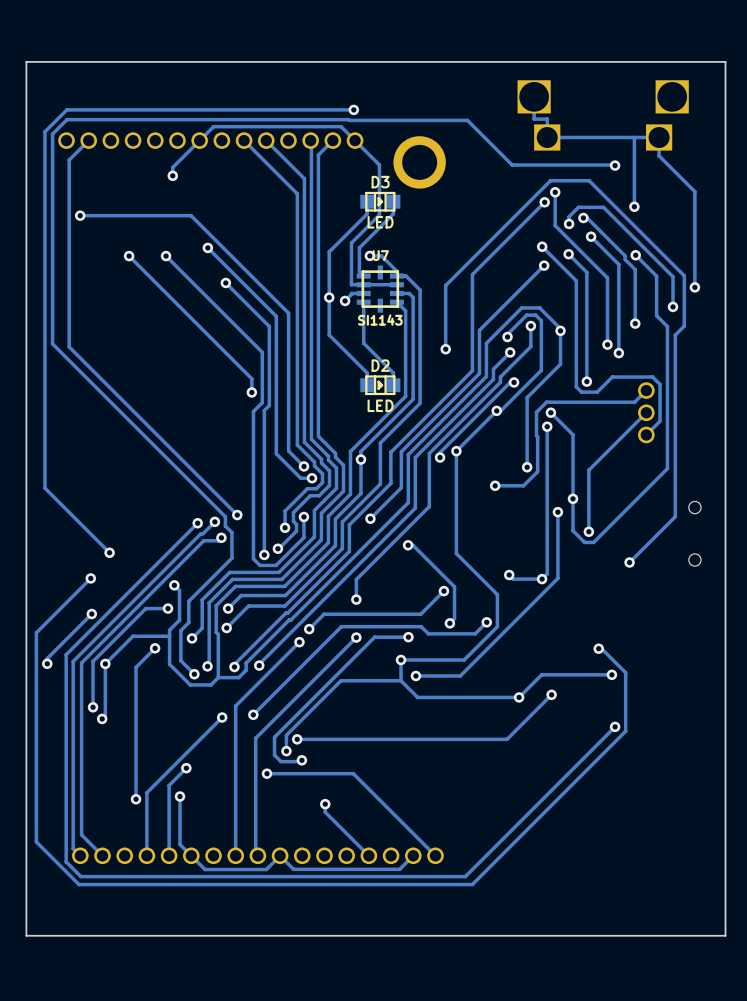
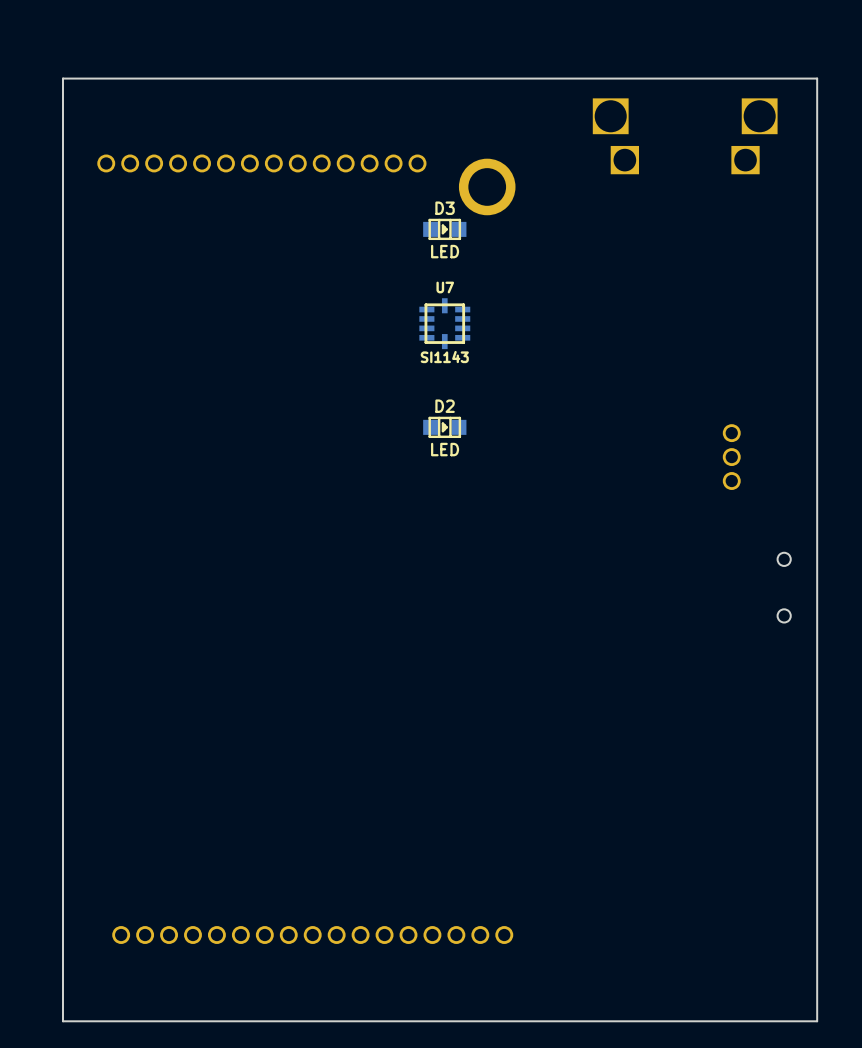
track: (534, 96) (534, 118) (547, 119) (547, 137) (659, 137) (659, 155) (694, 191) (694, 287) -> none
track: (353, 109) (66, 109) (44, 131) (44, 488) (109, 552) -> none
via: (353, 109) -> none
track: (634, 137) (634, 206) -> none
track: (88, 140) (69, 160) (69, 346) (237, 515) -> none
track: (244, 140) (297, 193) (297, 444) (314, 462) (314, 465) (322, 473) (322, 482) (316, 488) (307, 488) (285, 511) (285, 527) -> none
track: (266, 140) (304, 178) (304, 442) (321, 459) (321, 462) (329, 470) (329, 485) (319, 495) (310, 495) (293, 512) (296, 531) (277, 548) -> none
track: (310, 140) (311, 439) (328, 456) (328, 460) (336, 468) (336, 488) (314, 510) (314, 536) (278, 572) (229, 572) (202, 599) (202, 628) (192, 638) -> none
track: (332, 140) (318, 155) (318, 436) (335, 453) (335, 457) (343, 465) (343, 491) (321, 513) (321, 539) (281, 579) (232, 579) (209, 602) (209, 664) (207, 666) -> none
track: (615, 165) (512, 165) (467, 120) (66, 119) (52, 134) (52, 343) (225, 516) (225, 526) (231, 532) (231, 558) (188, 601) (188, 622) (180, 630) (180, 660) (194, 674) -> none
via: (615, 165) -> none
track: (172, 175) (172, 167) (213, 126) (341, 126) (379, 164) (379, 215) (351, 243) (351, 284) (396, 284) -> none
via: (172, 175) -> none
track: (555, 192) (555, 225) (607, 277) (607, 344) -> none
via: (555, 192) -> none
track: (367, 201) (367, 213) (329, 251) (329, 335) (367, 373) (367, 385) -> none
track: (393, 201) (393, 213) (359, 247) (359, 271) (363, 276) -> none
track: (544, 202) (472, 274) (472, 370) (390, 452) (390, 483) (349, 524) (349, 551) (234, 664) (234, 667) -> none
via: (544, 202) -> none
via: (634, 206) -> none
track: (80, 215) (191, 215) (288, 313) (288, 451) (304, 466) -> none
via: (80, 215) -> none
track: (583, 217) (587, 217) (625, 255) (625, 259) (635, 269) (635, 323) -> none
via: (583, 217) -> none
track: (569, 223) (569, 216) (578, 207) (603, 207) (673, 276) (673, 306) -> none
via: (569, 223) -> none
track: (591, 236) (618, 264) (618, 353) -> none
via: (591, 236) -> none
track: (542, 246) (576, 280) (576, 386) (581, 392) (597, 392) (612, 377) (652, 377) (660, 384) (660, 421) (646, 434) -> none
via: (542, 246) -> none
track: (207, 247) (276, 316) (276, 453) (300, 478) (312, 478) -> none
via: (207, 247) -> none
track: (568, 254) (586, 272) (586, 381) -> none
via: (568, 254) -> none
track: (369, 255) (381, 255) (396, 271) (396, 276) (406, 276) (420, 290) (420, 403) (380, 443) (380, 484) (342, 522) (342, 548) (284, 606) (248, 606) (226, 627) -> none
via: (369, 255) -> none
track: (635, 255) (656, 276) (656, 315) (667, 326) (667, 468) (593, 542) (584, 542) (572, 530) (572, 434) (550, 412) -> none
via: (635, 255) -> none
track: (129, 256) (251, 378) (251, 392) -> none
via: (129, 256) -> none
track: (166, 256) (262, 352) (262, 402) (253, 411) (253, 558) (259, 565) (276, 565) (303, 537) (303, 516) -> none
via: (166, 256) -> none
track: (544, 265) (479, 330) (479, 373) (401, 451) (401, 487) (370, 518) -> none
via: (544, 265) -> none
track: (225, 282) (269, 326) (269, 405) (264, 410) (264, 554) -> none
via: (225, 282) -> none
via: (694, 287) -> none
track: (363, 293) (351, 293) (345, 300) -> none
track: (396, 293) (409, 293) (413, 297) (413, 399) (360, 451) (360, 493) (335, 519) (335, 545) (285, 595) (241, 595) (228, 608) -> none
via: (329, 297) -> none
via: (345, 300) -> none
track: (363, 302) (363, 343) (393, 373) (393, 385) -> none
track: (396, 302) (405, 310) (405, 396) (350, 451) (350, 494) (328, 516) (328, 542) (284, 586) (235, 586) (216, 605) (218, 677) -> none
via: (673, 306) -> none
via: (635, 323) -> none
track: (530, 326) (530, 346) (500, 377) (500, 382) (429, 453) (429, 506) (356, 579) (356, 599) -> none
via: (530, 326) -> none
via: (560, 330) -> none
track: (507, 337) (507, 334) (526, 315) (535, 315) (541, 320) (541, 370) (456, 451) (456, 553) (497, 594) (497, 626) (464, 659) (401, 659) (401, 680) -> none
via: (507, 337) -> none
via: (607, 344) -> none
track: (445, 349) (445, 285) (550, 180) (589, 180) (684, 275) (684, 326) (675, 335) (675, 516) (629, 562) -> none
via: (445, 349) -> none
track: (510, 352) (493, 369) (493, 379) (415, 457) (415, 508) (259, 665) -> none
via: (510, 352) -> none
via: (618, 353) -> none
via: (586, 381) -> none
track: (514, 382) (510, 382) (440, 452) (440, 457) -> none
via: (514, 382) -> none
track: (646, 390) (634, 402) (546, 402) (536, 412) (537, 471) (523, 485) (495, 485) -> none
via: (251, 392) -> none
via: (496, 410) -> none
via: (550, 412) -> none
track: (646, 412) (588, 470) (588, 531) -> none
track: (547, 426) (547, 573) (542, 579) (513, 579) (509, 575) -> none
via: (547, 426) -> none
via: (456, 451) -> none
via: (440, 457) -> none
via: (360, 459) -> none
via: (304, 466) -> none
track: (527, 467) (527, 397) (560, 364) (560, 328) (539, 307) (521, 307) (486, 343) (486, 376) (408, 454) (408, 502) (246, 663) (246, 670) (238, 677) (218, 677) -> none
via: (527, 467) -> none
via: (312, 478) -> none
via: (495, 485) -> none
via: (572, 498) -> none
track: (557, 512) (557, 578) (460, 676) (415, 676) -> none
via: (557, 512) -> none
via: (237, 515) -> none
via: (303, 516) -> none
via: (370, 518) -> none
track: (214, 521) (73, 661) (73, 848) (80, 855) -> none
via: (214, 521) -> none
track: (197, 523) (66, 654) (66, 861) (80, 876) (465, 876) (615, 726) -> none
via: (197, 523) -> none
via: (285, 527) -> none
via: (588, 531) -> none
track: (221, 537) (218, 540) (203, 540) (81, 662) (81, 834) (102, 855) -> none
via: (221, 537) -> none
track: (408, 545) (412, 545) (454, 586) (454, 618) (449, 623) -> none
via: (408, 545) -> none
via: (277, 548) -> none
via: (109, 552) -> none
via: (264, 554) -> none
via: (629, 562) -> none
via: (509, 575) -> none
track: (90, 578) (36, 632) (36, 841) (78, 884) (472, 884) (625, 731) (625, 672) (601, 648) (598, 648) -> none
via: (90, 578) -> none
via: (542, 579) -> none
track: (174, 585) (179, 590) (179, 620) (169, 630) (169, 664) (190, 684) (211, 684) (218, 677) -> none
via: (174, 585) -> none
track: (443, 591) (420, 614) (324, 614) (309, 629) -> none
via: (443, 591) -> none
via: (356, 599) -> none
track: (167, 608) (145, 608) (93, 661) (93, 707) -> none
via: (167, 608) -> none
via: (228, 608) -> none
track: (91, 614) (47, 658) (47, 663) -> none
via: (91, 614) -> none
track: (486, 622) (475, 633) (428, 633) (421, 626) (341, 626) (253, 714) -> none
via: (486, 622) -> none
via: (449, 623) -> none
via: (226, 627) -> none
via: (309, 629) -> none
track: (169, 636) (133, 636) (105, 663) (105, 715) (102, 718) -> none
track: (356, 637) (255, 738) (255, 853) (257, 855) -> none
via: (356, 637) -> none
track: (408, 637) (374, 637) (274, 737) (274, 755) (281, 761) (301, 760) -> none
via: (408, 637) -> none
via: (192, 638) -> none
track: (299, 642) (235, 705) (235, 855) -> none
via: (299, 642) -> none
track: (155, 648) (136, 667) (136, 799) -> none
via: (155, 648) -> none
via: (598, 648) -> none
via: (401, 659) -> none
via: (47, 663) -> none
via: (105, 663) -> none
via: (259, 665) -> none
via: (207, 666) -> none
via: (234, 667) -> none
via: (194, 674) -> none
track: (611, 674) (541, 674) (519, 697) (417, 697) (401, 680) -> none
via: (611, 674) -> none
via: (415, 676) -> none
track: (401, 680) (340, 680) (286, 735) (286, 751) -> none
track: (551, 694) (507, 739) (297, 739) -> none
via: (551, 694) -> none
via: (519, 697) -> none
via: (93, 707) -> none
via: (253, 714) -> none
track: (222, 717) (146, 792) (146, 855) -> none
via: (222, 717) -> none
via: (102, 718) -> none
via: (615, 726) -> none
via: (297, 739) -> none
via: (286, 751) -> none
via: (301, 760) -> none
track: (186, 768) (169, 785) (169, 855) -> none
via: (186, 768) -> none
track: (266, 773) (353, 773) (435, 855) -> none
via: (266, 773) -> none
track: (179, 796) (179, 844) (205, 869) (266, 869) (280, 855) (293, 869) (399, 869) (413, 855) -> none
via: (179, 796) -> none
via: (136, 799) -> none
track: (325, 804) (325, 812) (368, 855) -> none
via: (325, 804) -> none

